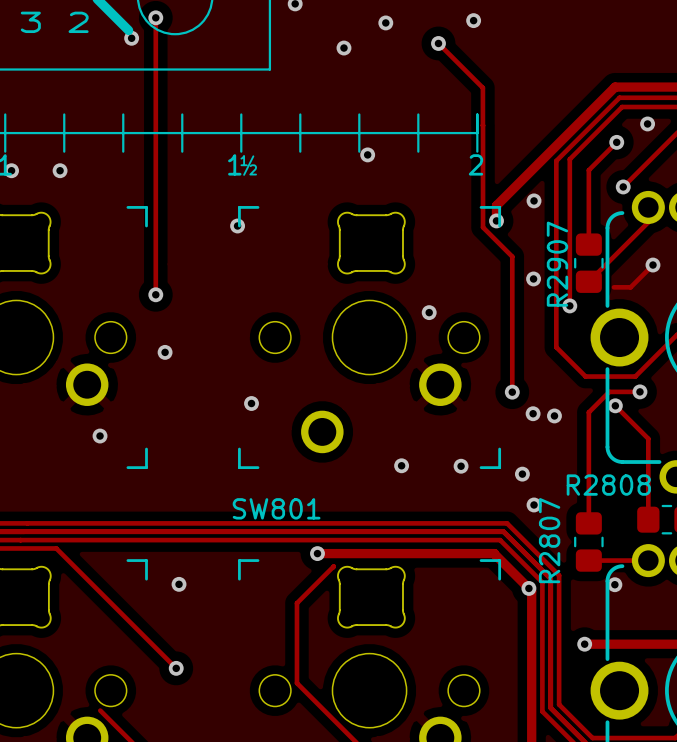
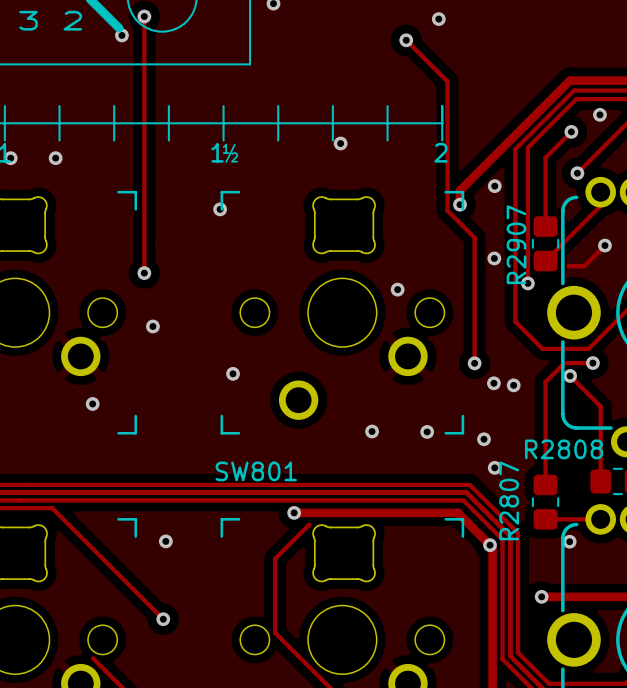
via: (385, 22) -> none
via: (343, 48) -> none

